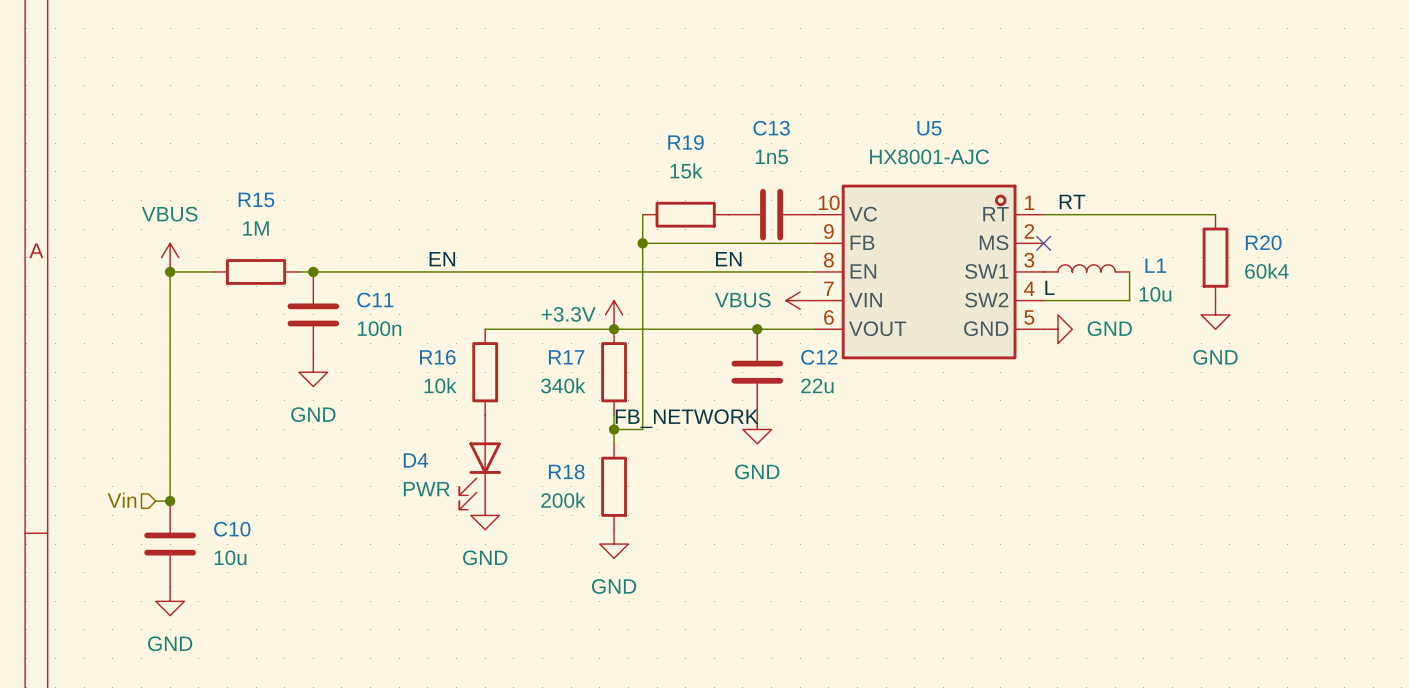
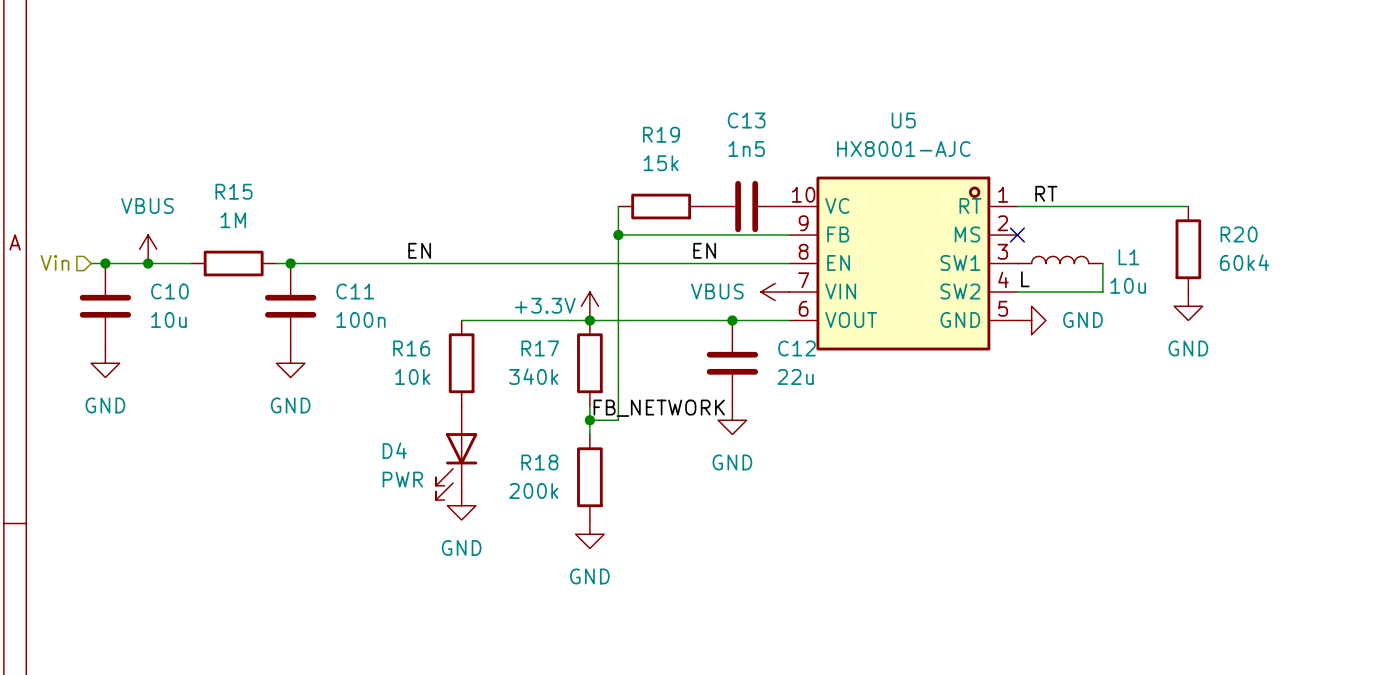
junction: none -> (105, 263)
wire: (170, 271) (170, 501) (155, 501) -> (148, 263) (91, 263)
hierarchical label position: Vin (121, 500) -> Vin (54, 262)
junction: (170, 501) -> none
C10 position: (170, 544) -> (105, 306)
power symbol position: GND (170, 601) -> GND (105, 363)

